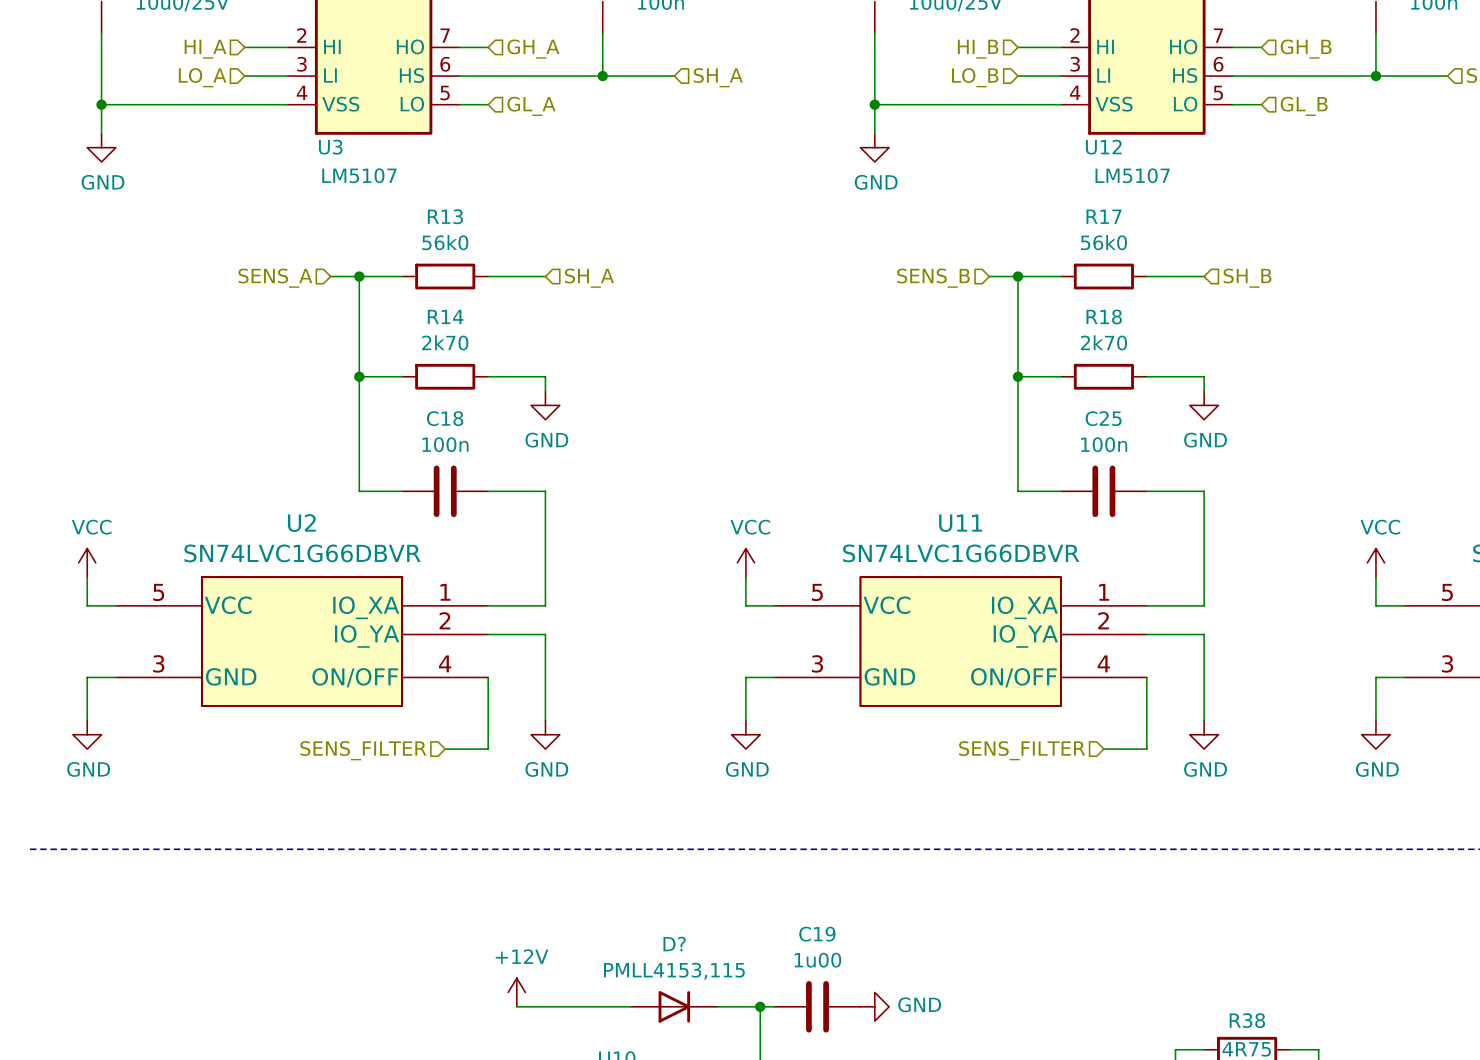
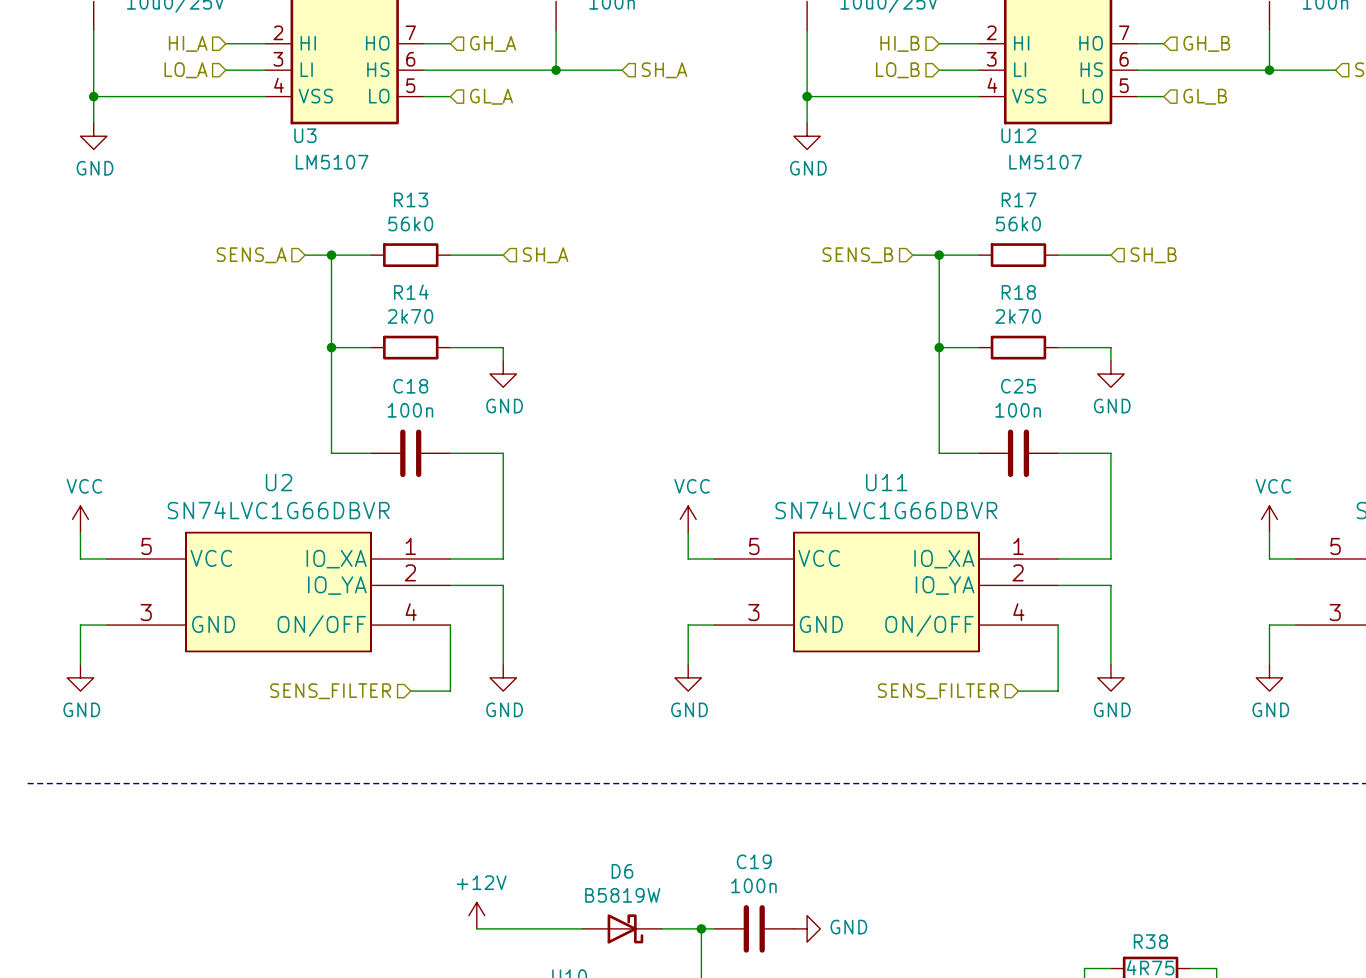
C19 value: 1u00 (817, 960) -> 100n (753, 885)
D?: PMLL4153,115 (674, 1006) -> none
D6: none -> B5819W (622, 928)

